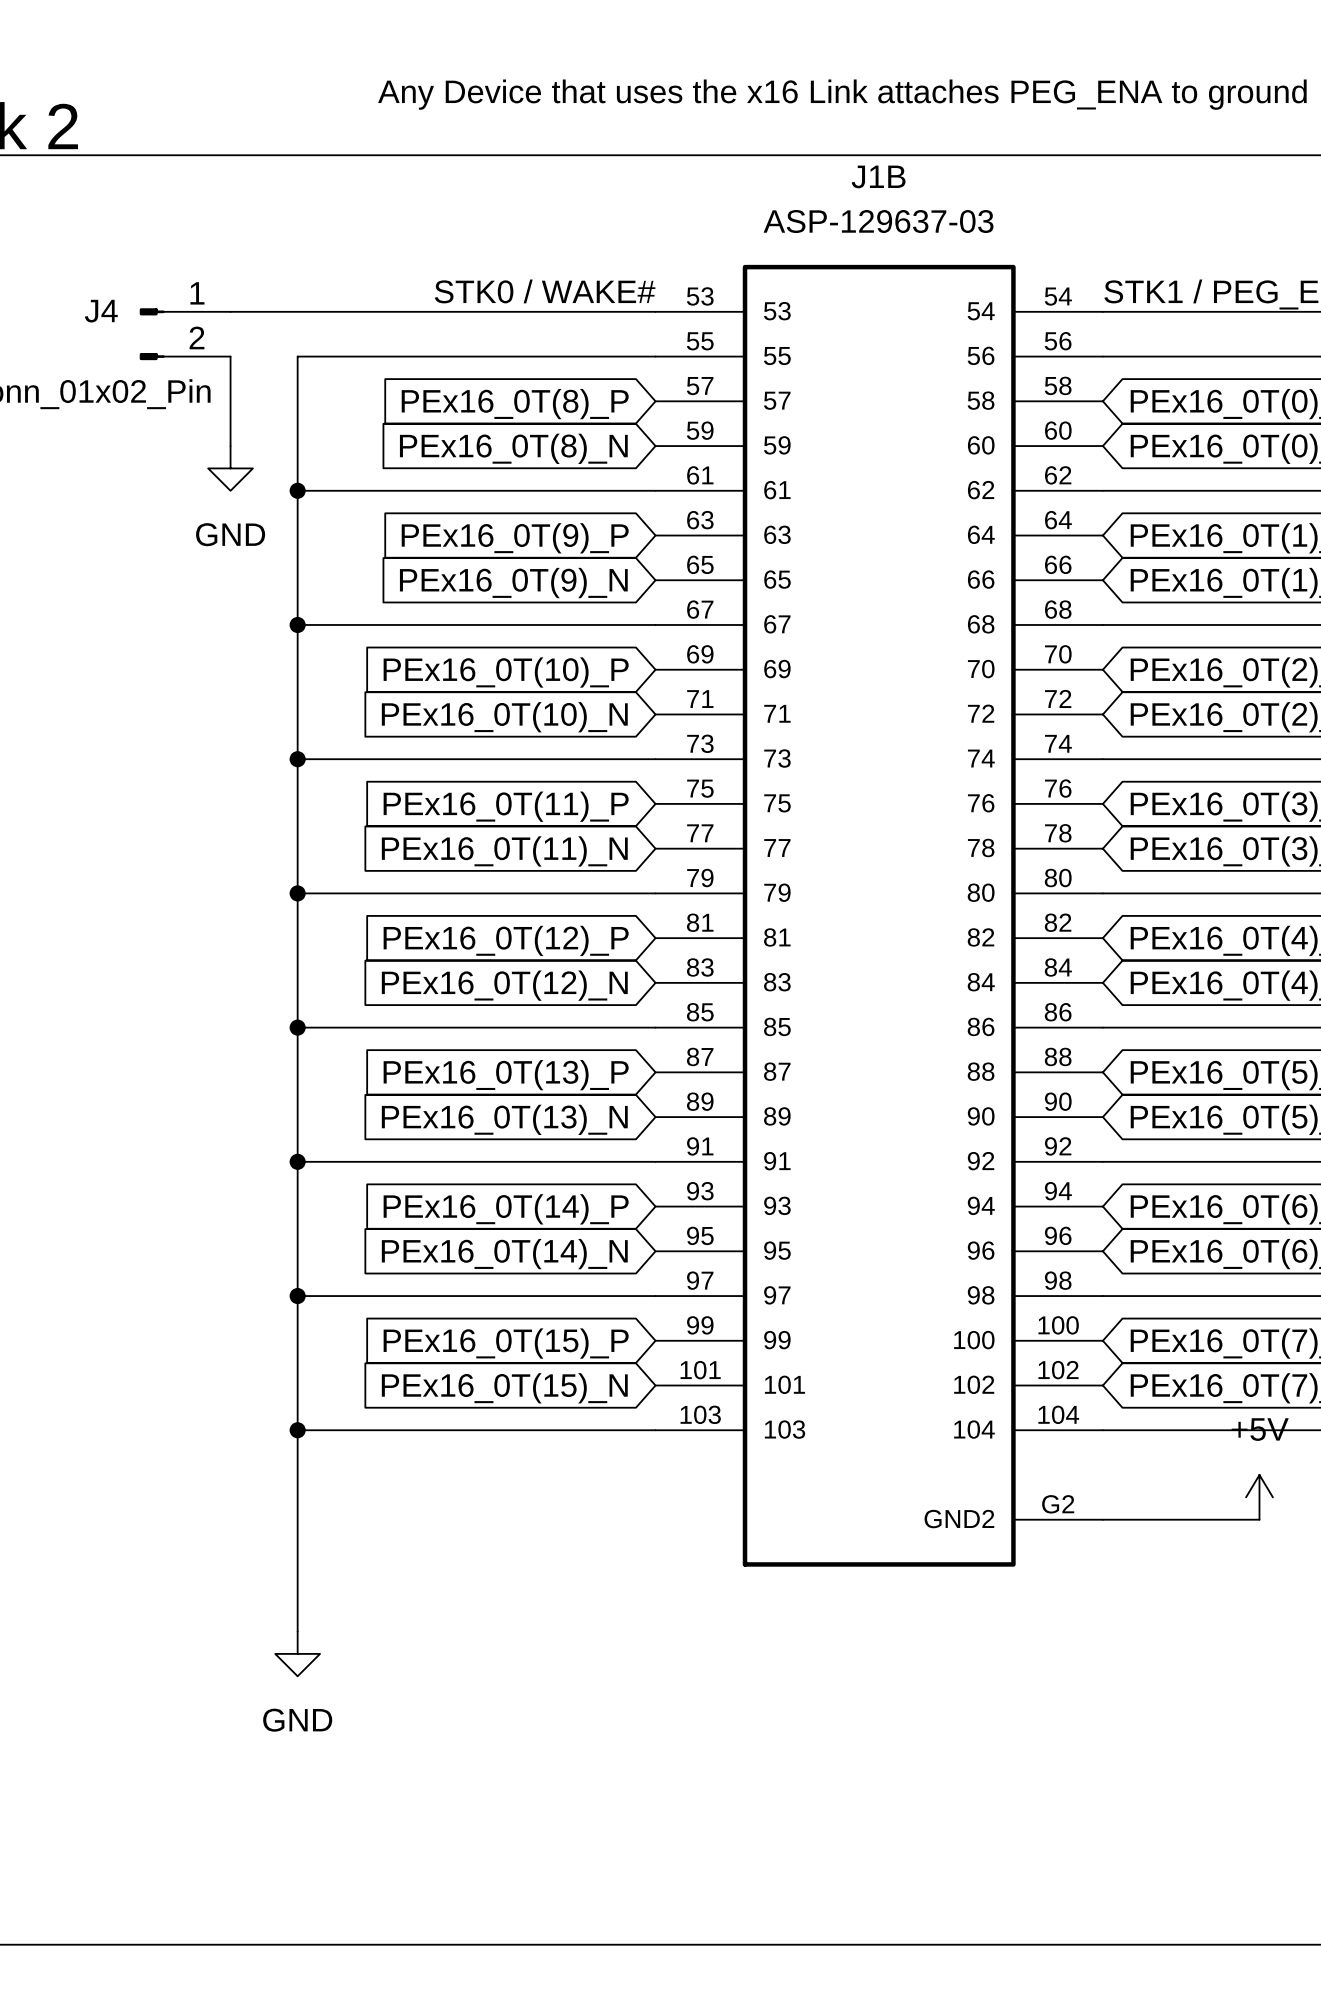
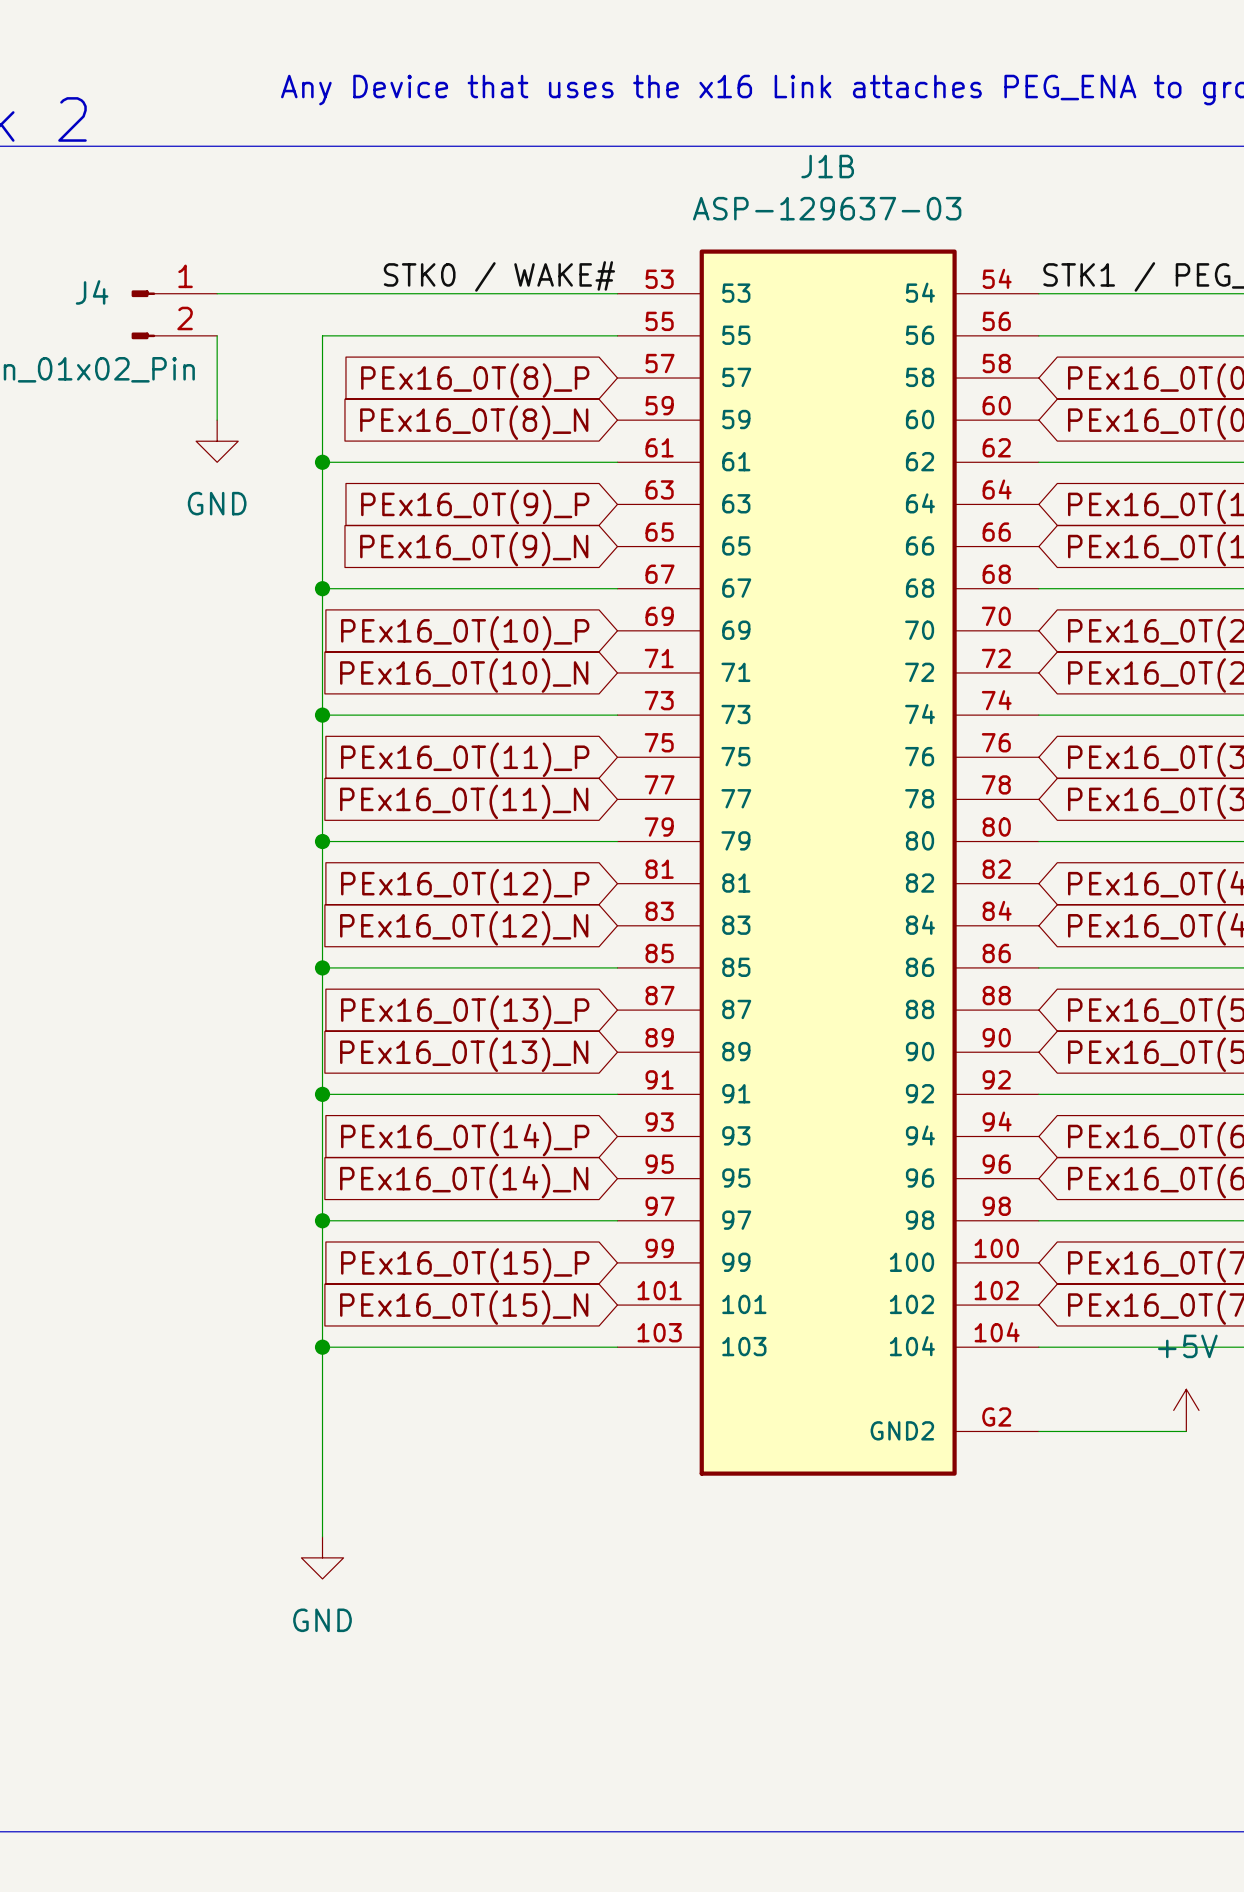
wire: (342, 356) (297, 356) (297, 1631) -> (322, 335) (322, 1536)
wire: (297, 490) (342, 490) -> none
junction position: (297, 490) -> (322, 462)
wire: (297, 624) (342, 624) -> none
junction position: (297, 624) -> (322, 588)
wire: (297, 759) (342, 759) -> none
junction position: (297, 759) -> (322, 715)
wire: (297, 893) (342, 893) -> none
junction position: (297, 893) -> (322, 841)
wire: (297, 1027) (342, 1027) -> none
junction position: (297, 1027) -> (322, 967)
wire: (297, 1161) (342, 1161) -> none
junction position: (297, 1161) -> (322, 1094)
wire: (297, 1296) (342, 1296) -> none
junction position: (297, 1296) -> (322, 1220)
wire: (297, 1430) (342, 1430) -> none
junction position: (297, 1430) -> (322, 1347)
power symbol position: GND (297, 1653) -> GND (322, 1557)

